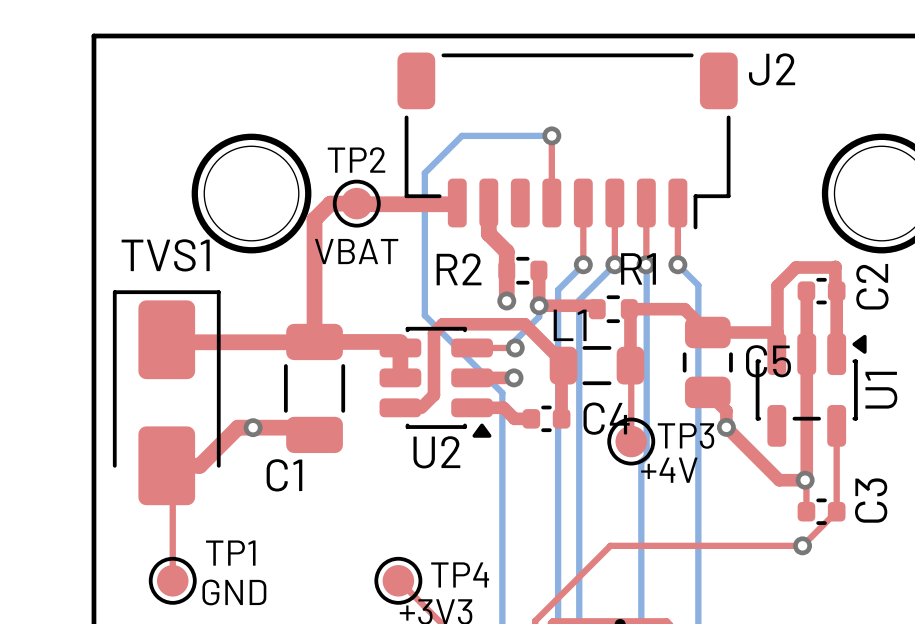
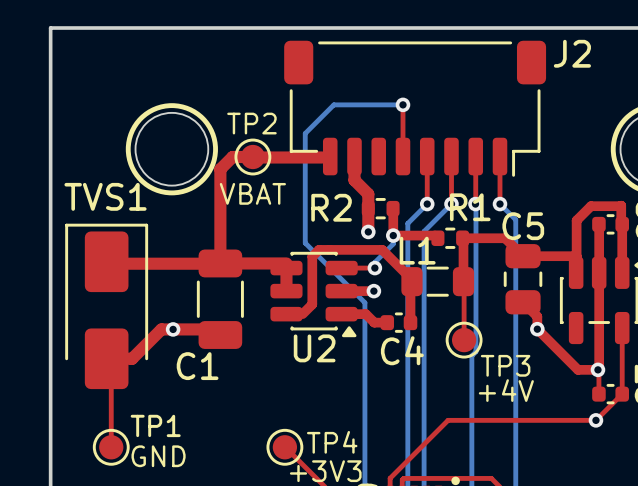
C5 name position: C5 (768, 361) -> C5 (523, 226)
C4 name position: C4 (606, 418) -> C4 (402, 350)
TP3 name position: TP3 (685, 435) -> TP3 (505, 365)
TP3 text position: +4V (669, 470) -> +4V (506, 390)

